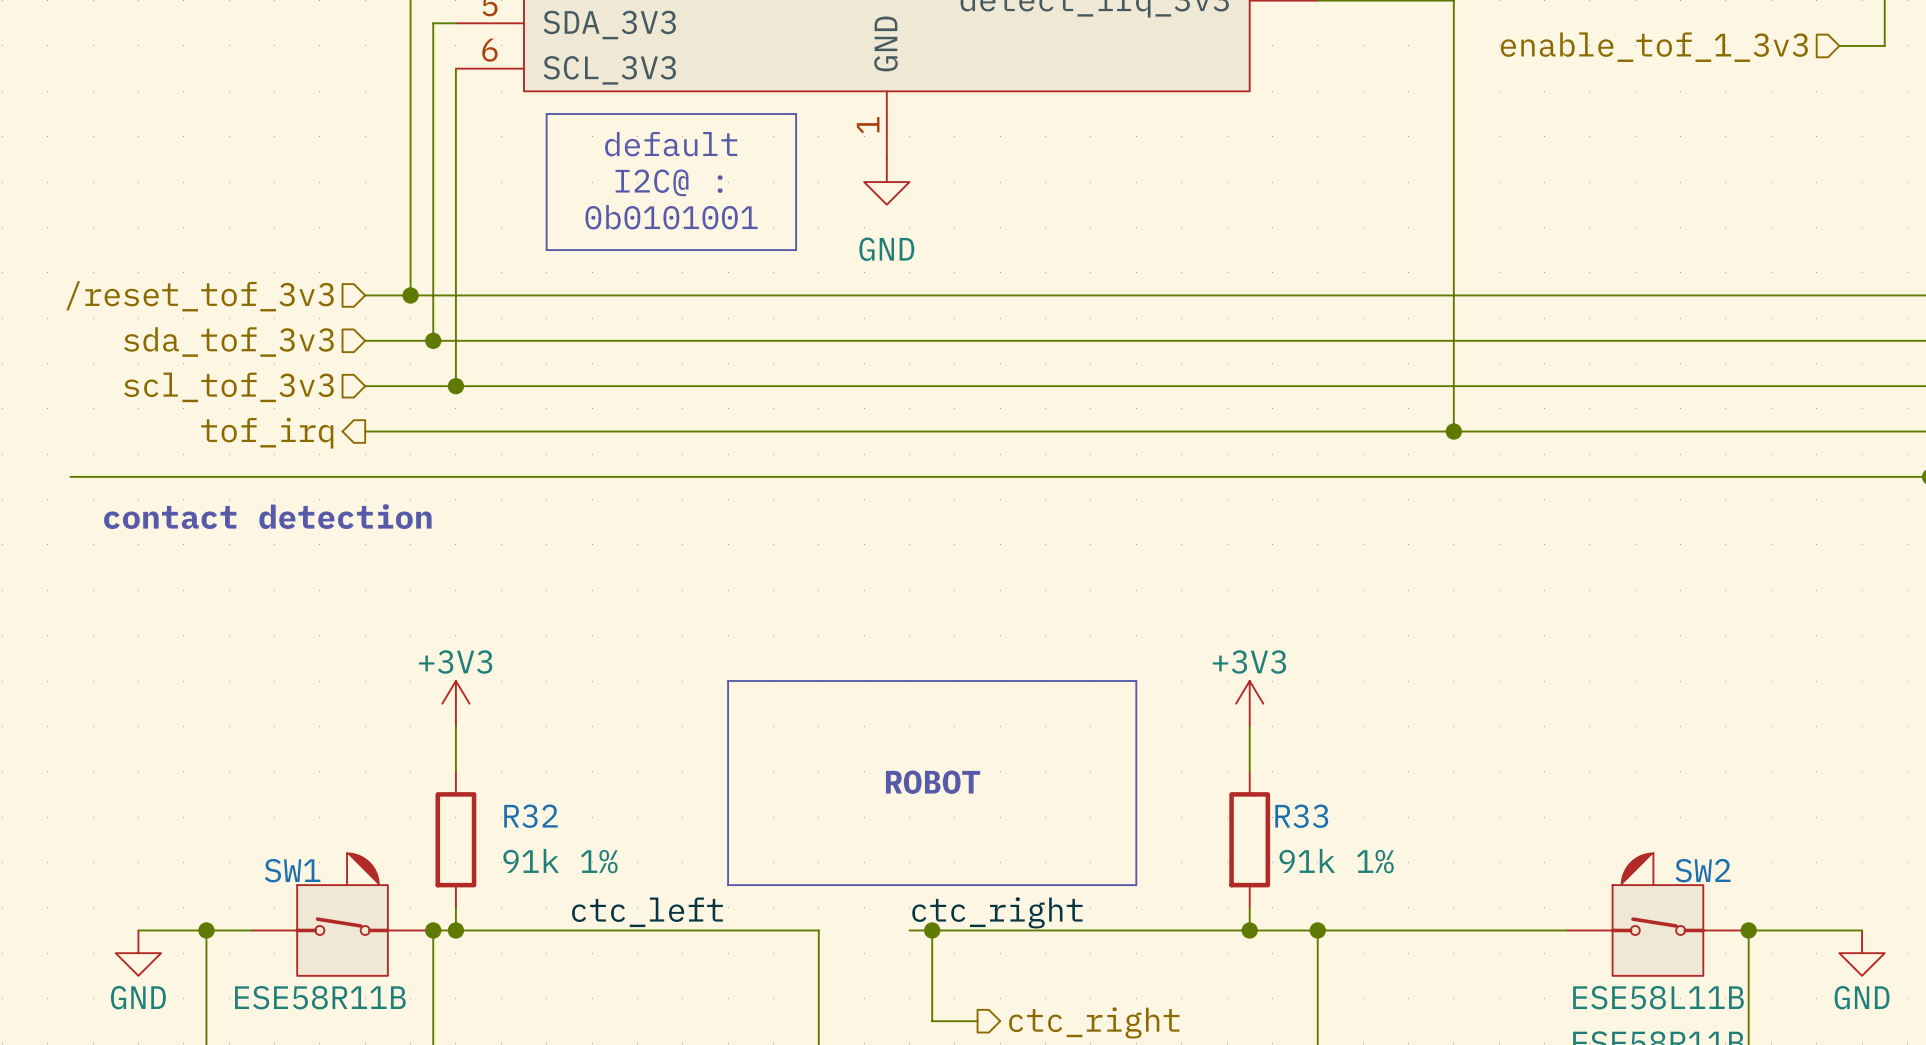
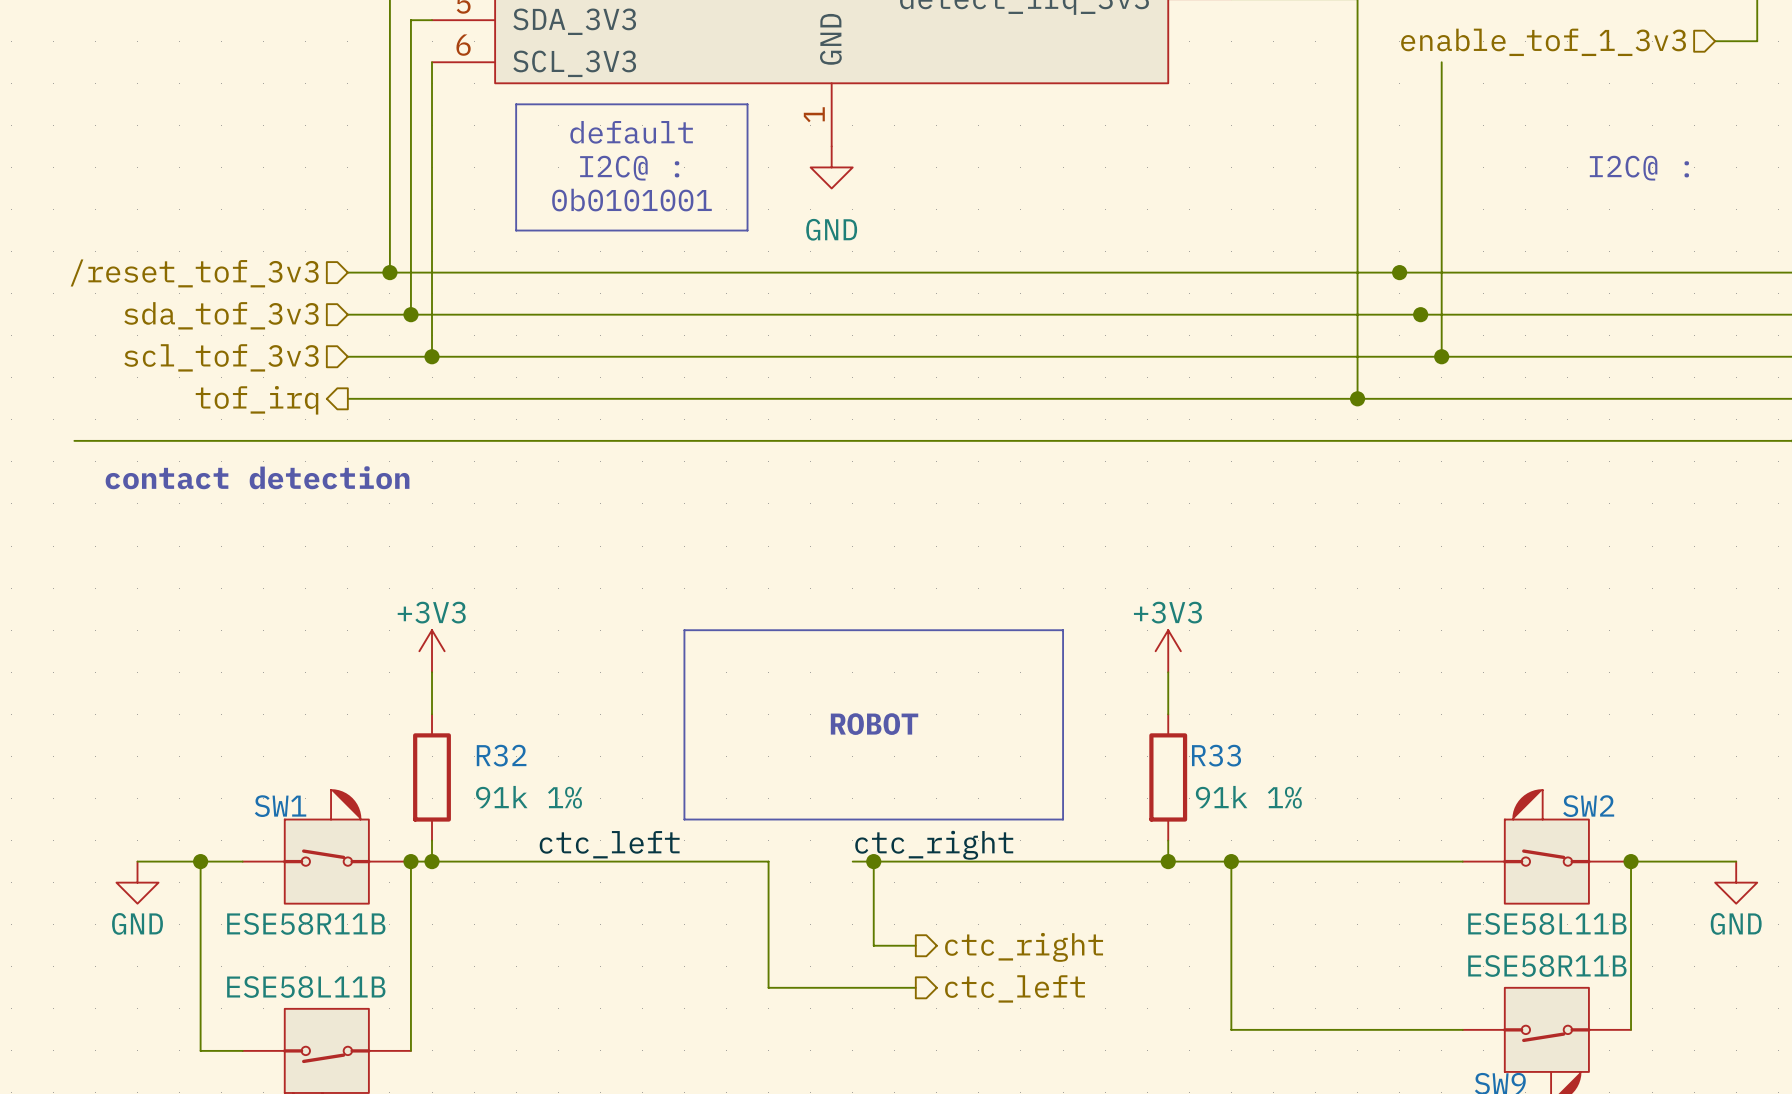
wire: none -> (1441, 62) (1441, 356)
text: none -> I2C@ : (1639, 168)
junction: none -> (1399, 272)
junction: none -> (1420, 314)
junction: none -> (1441, 356)

